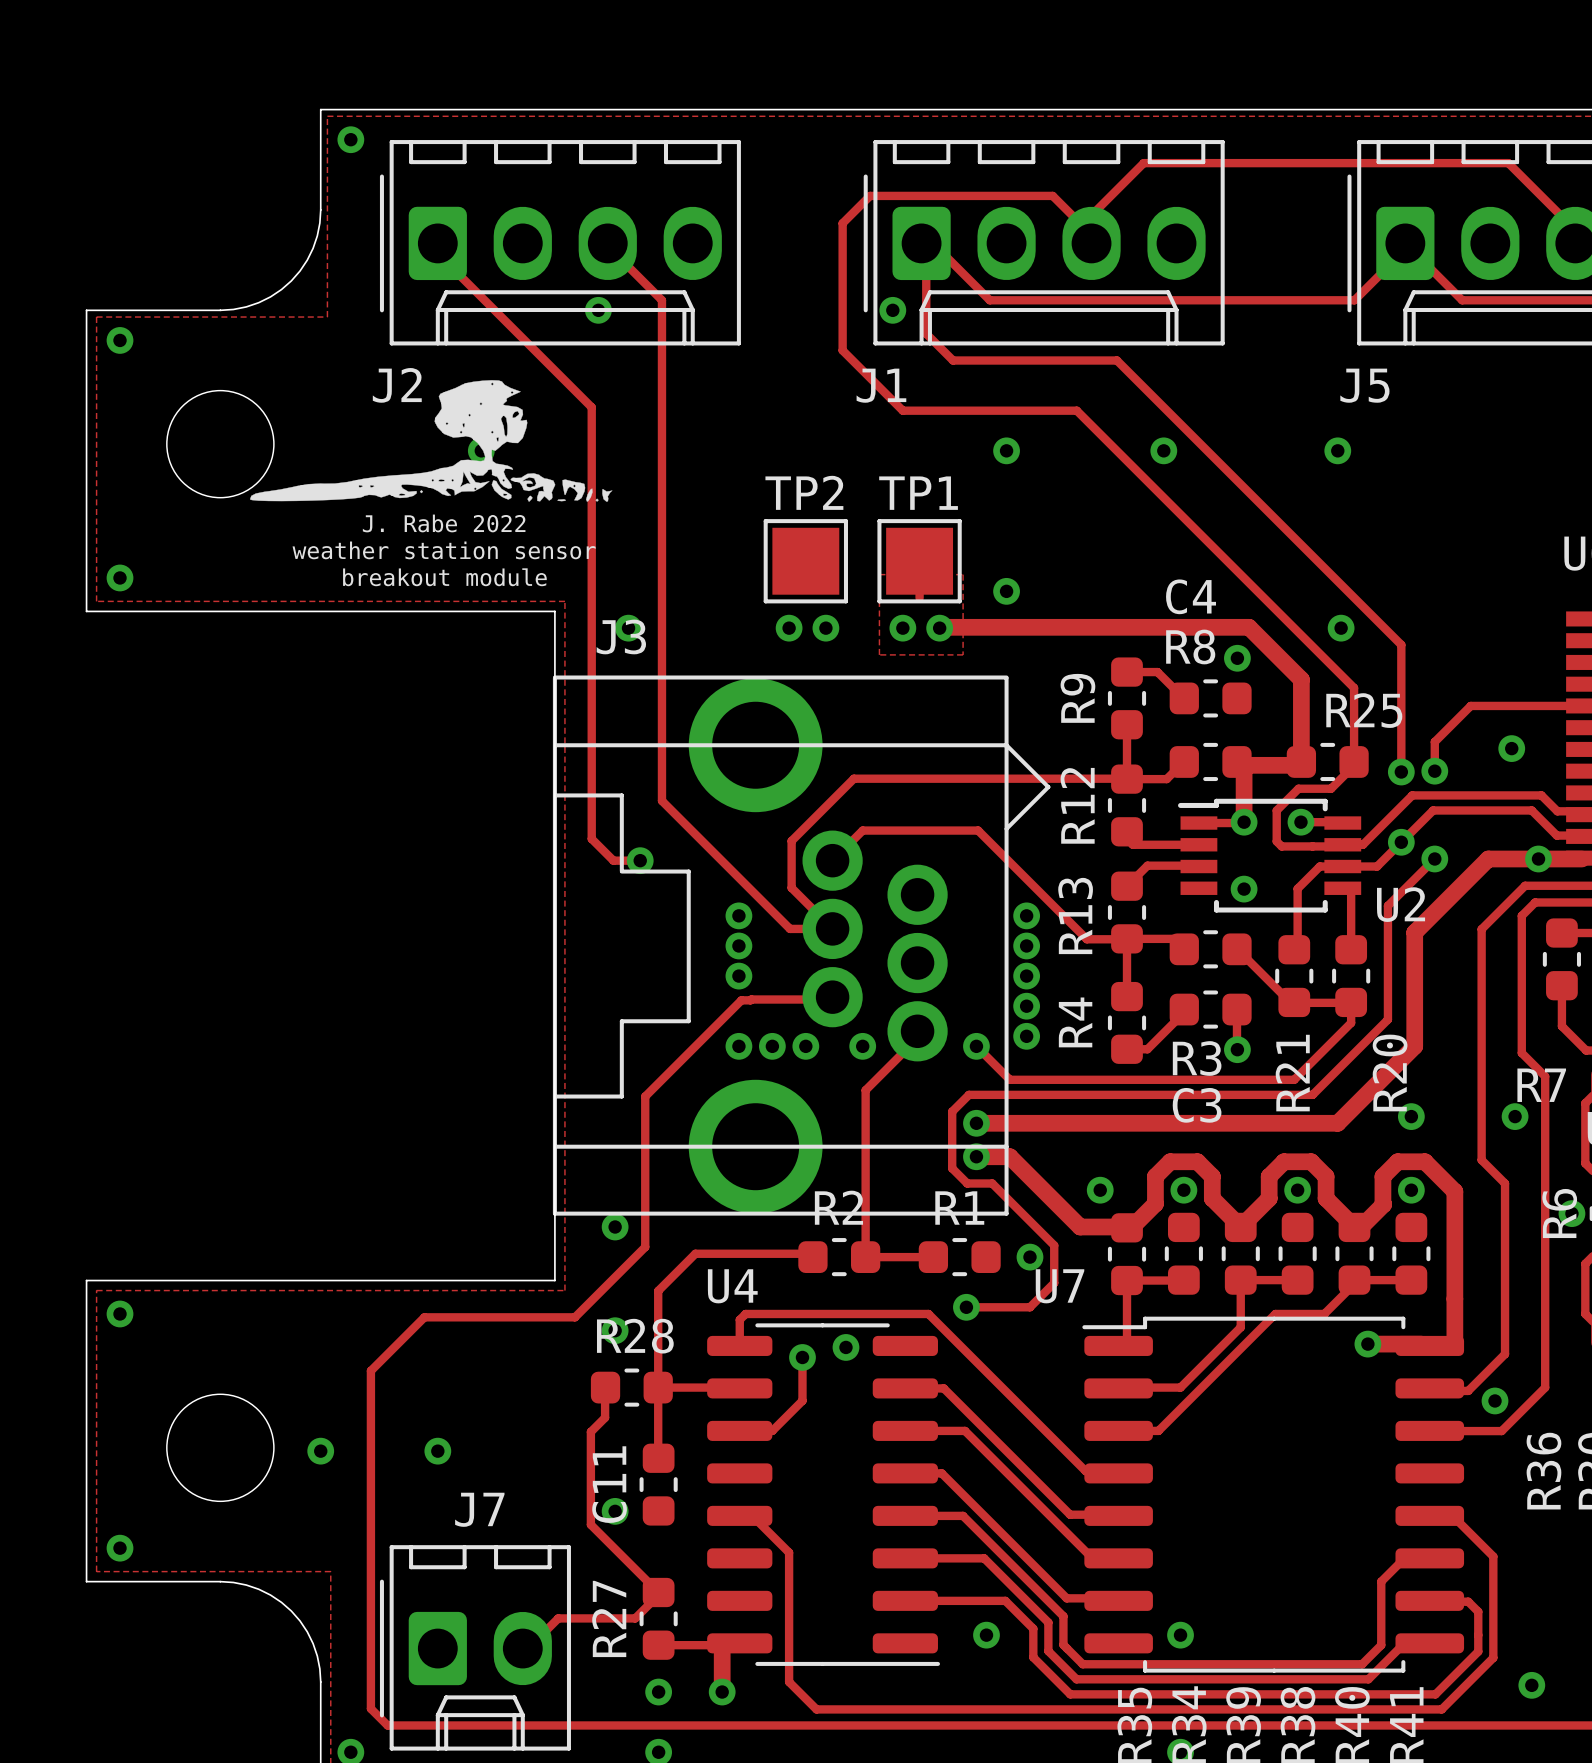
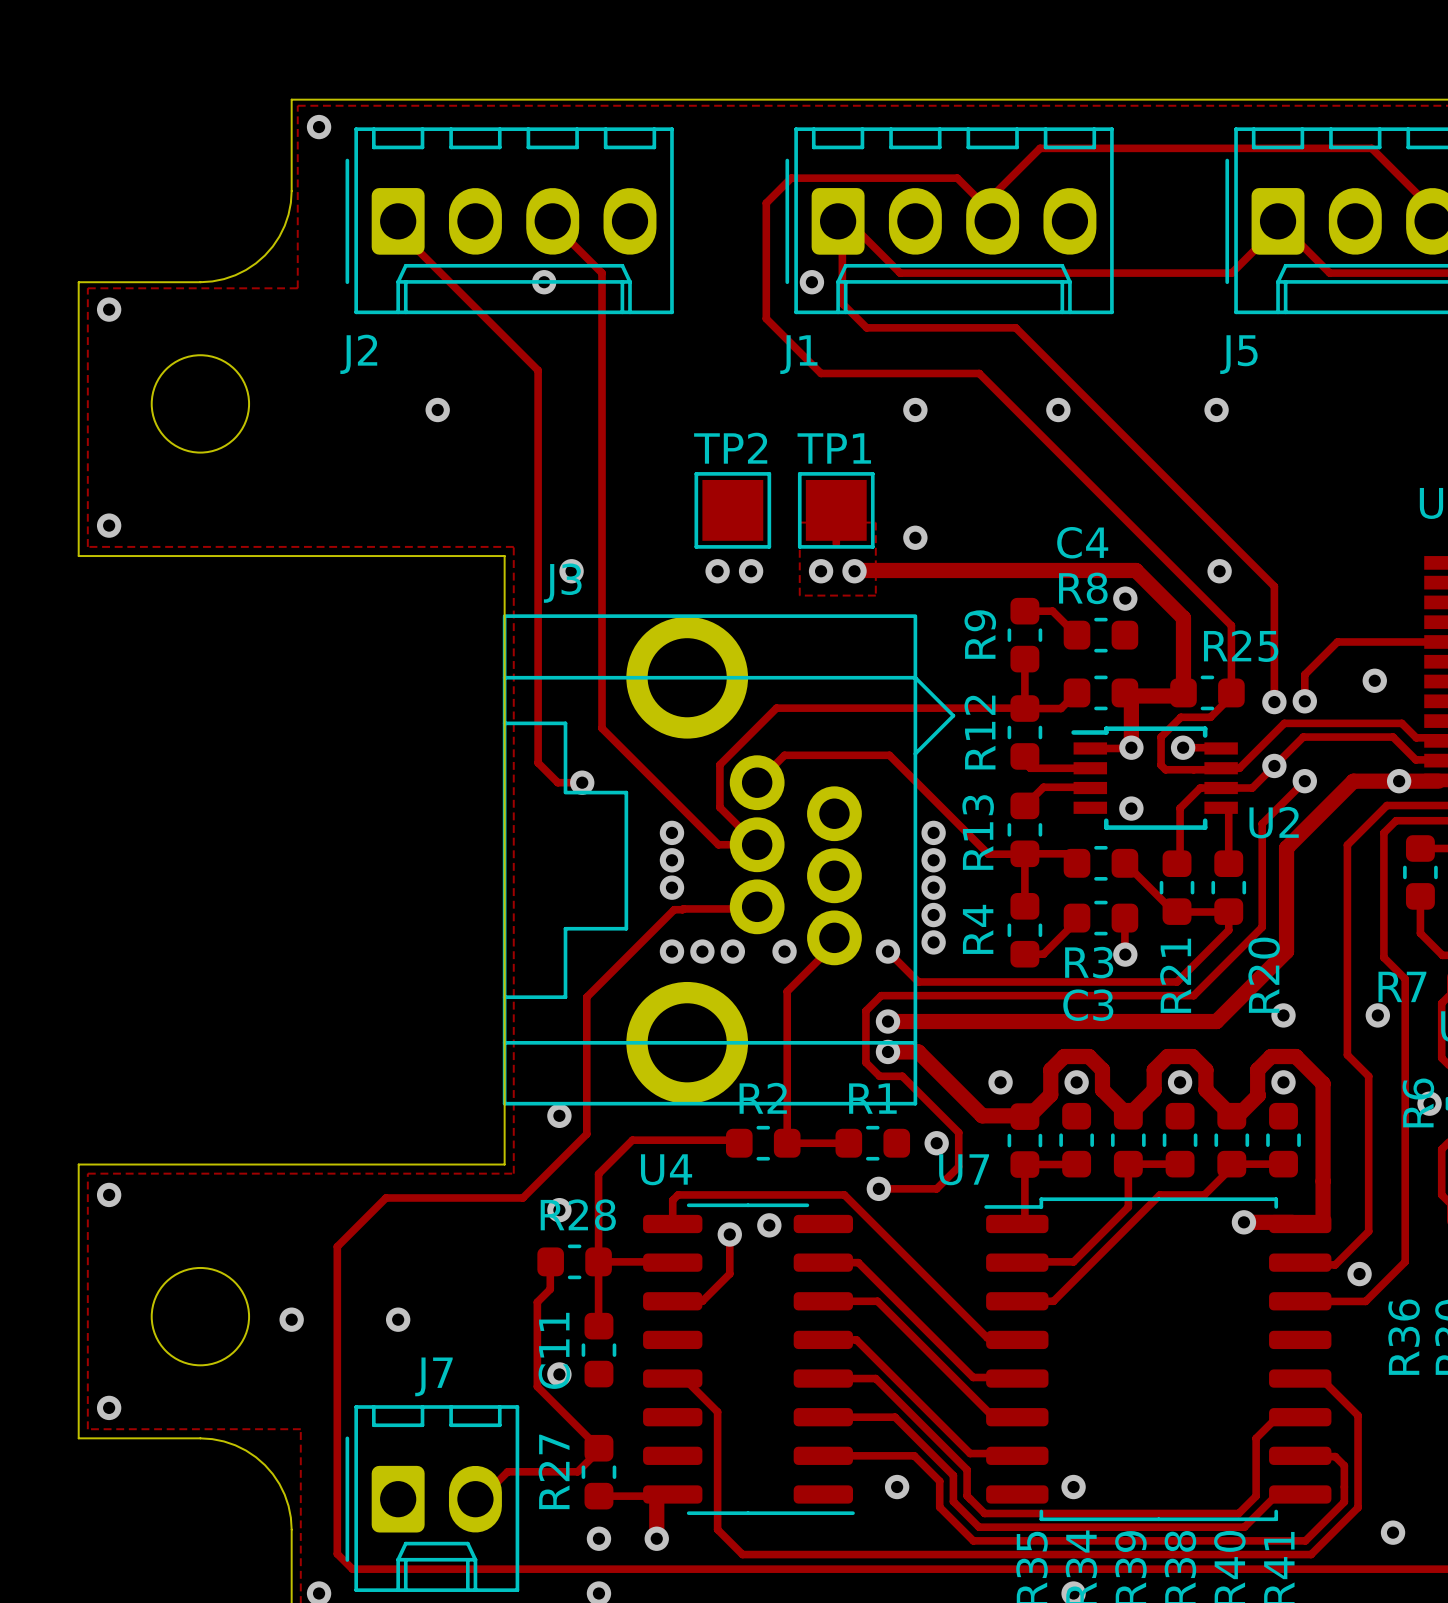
drawing: [249, 380, 613, 502] -> none
text: J. Rabe 2022 (444, 523) -> none
text: weather station sensor (444, 550) -> none
text: breakout module (444, 577) -> none

